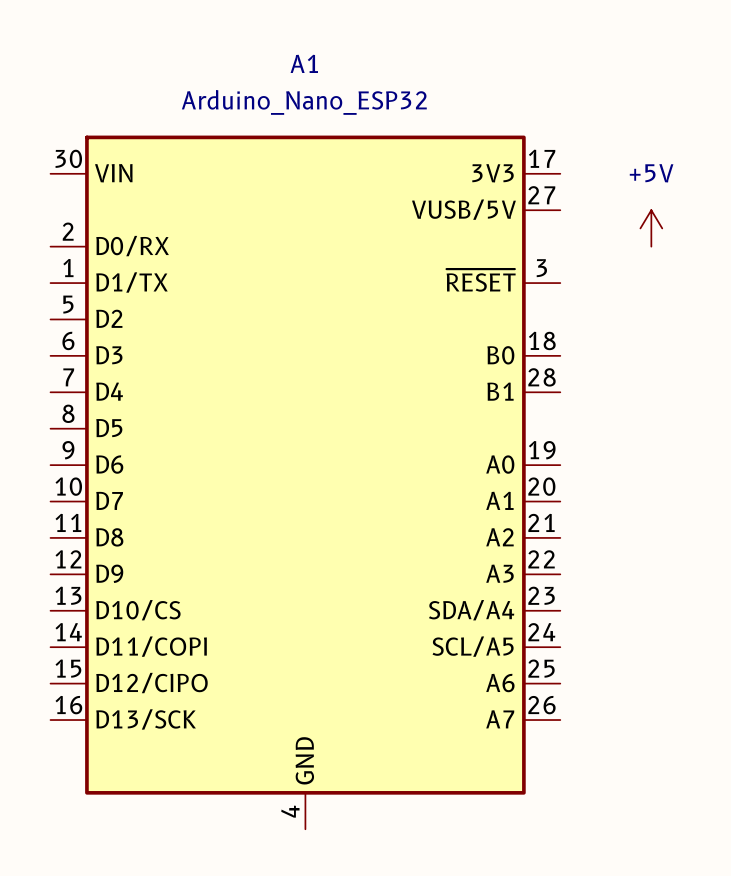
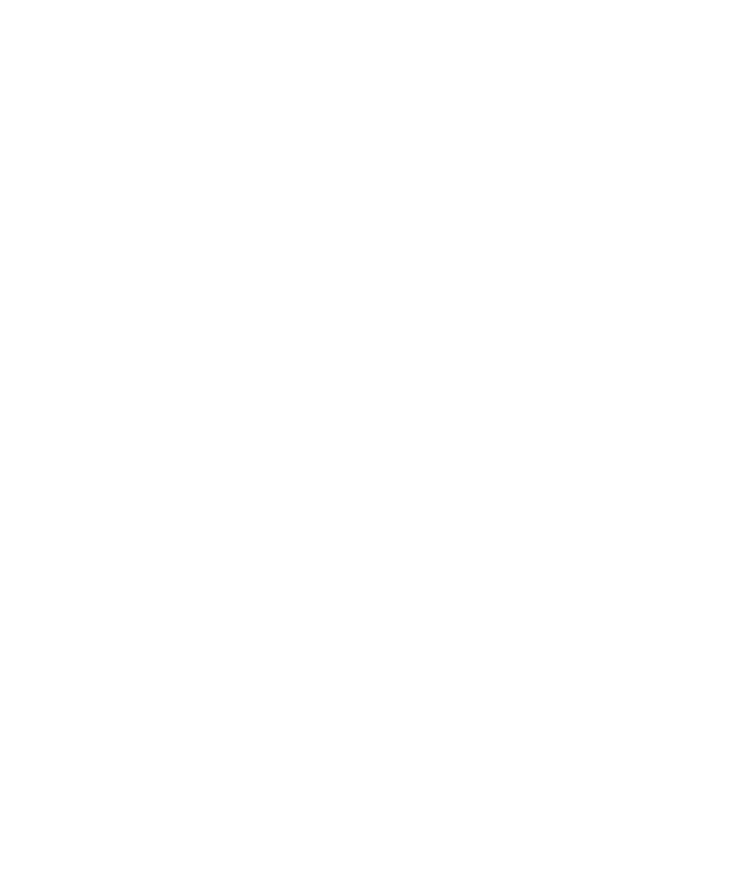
power symbol: +5V (651, 228) -> none
A1: Arduino_Nano_ESP32 (305, 482) -> none

